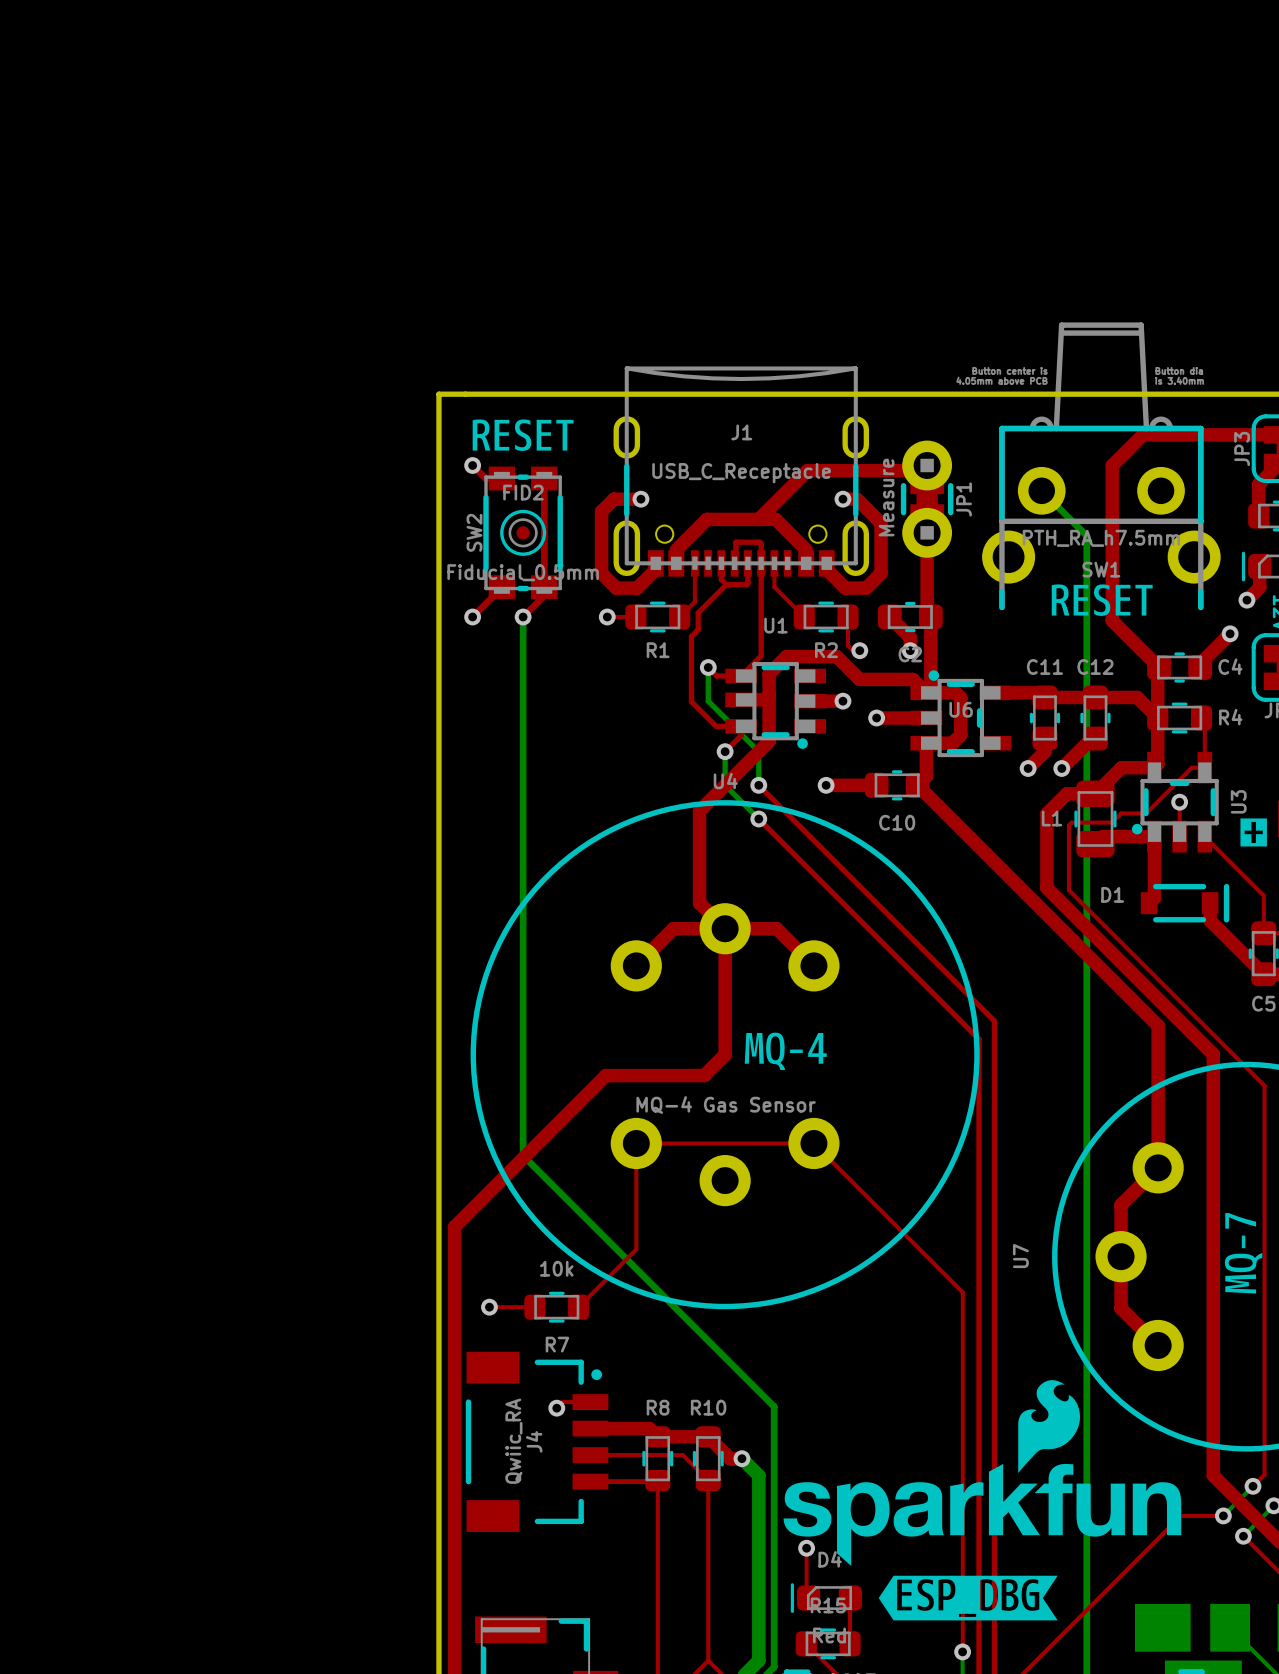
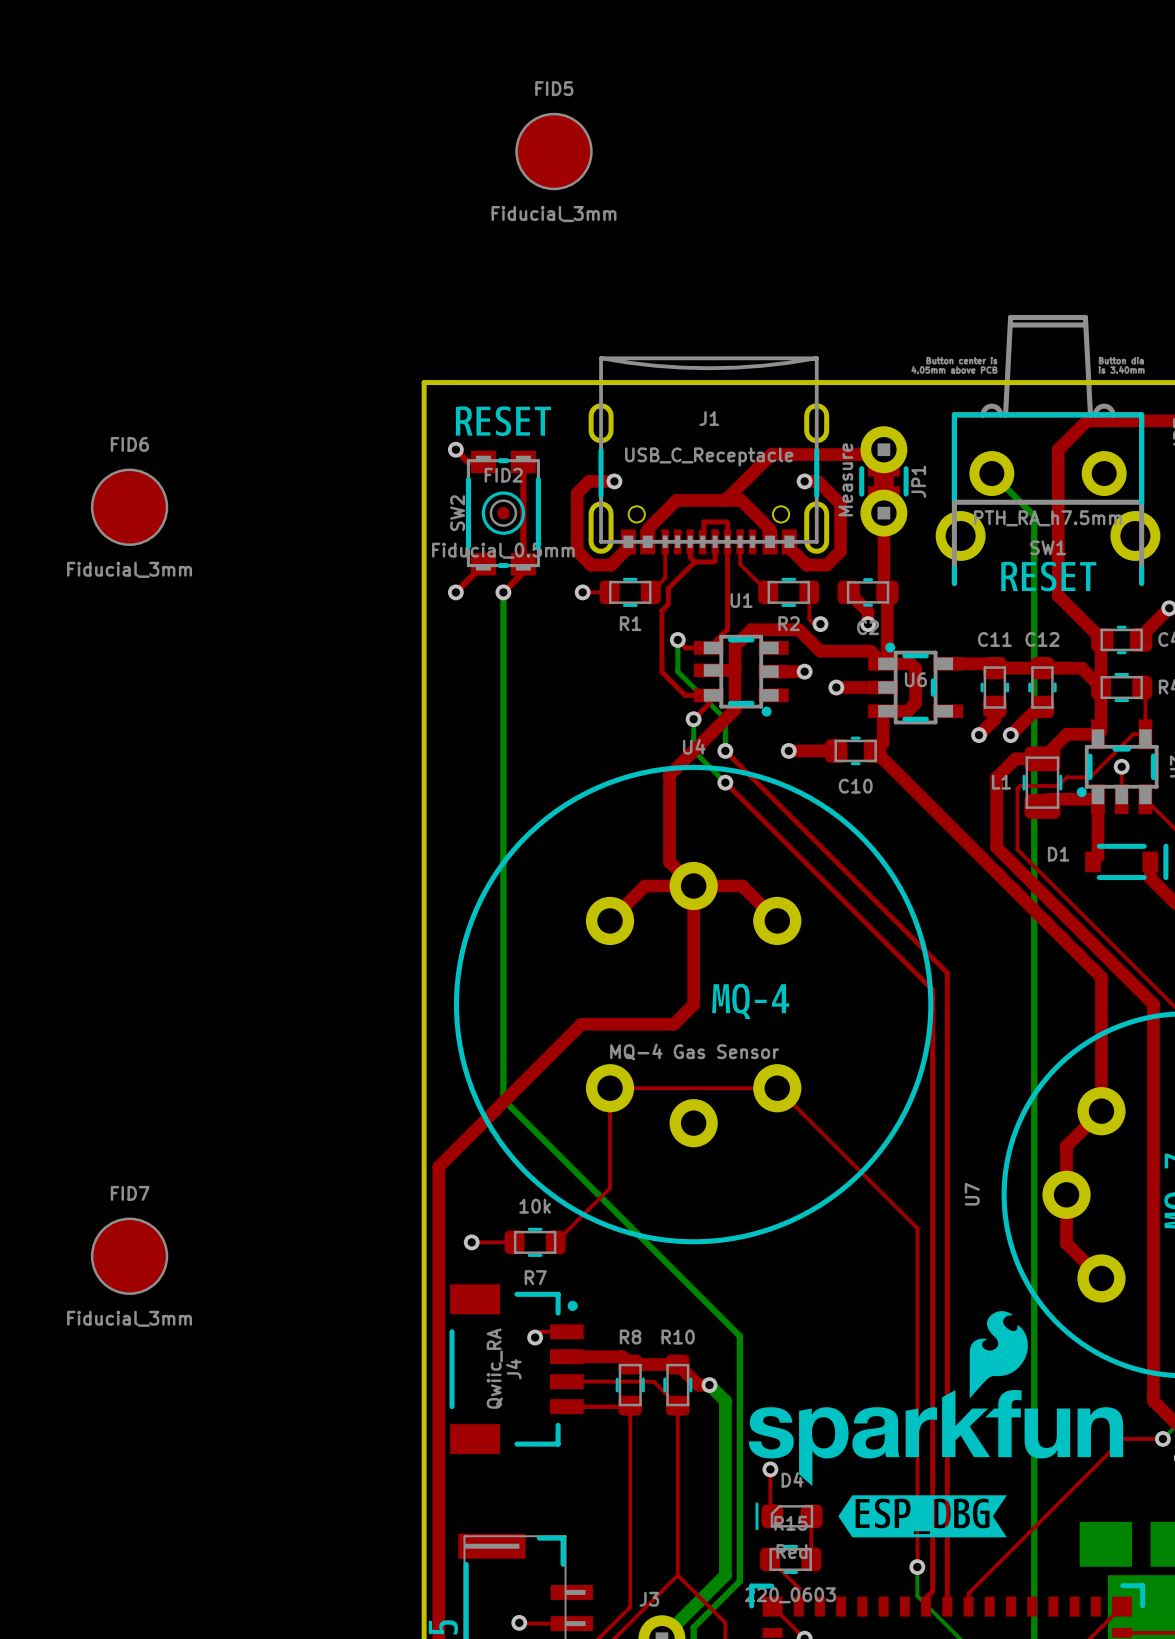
FID5: none -> Fiducial_3mm (553, 151)
FID6: none -> Fiducial_3mm (129, 507)
FID7: none -> Fiducial_3mm (129, 1256)

